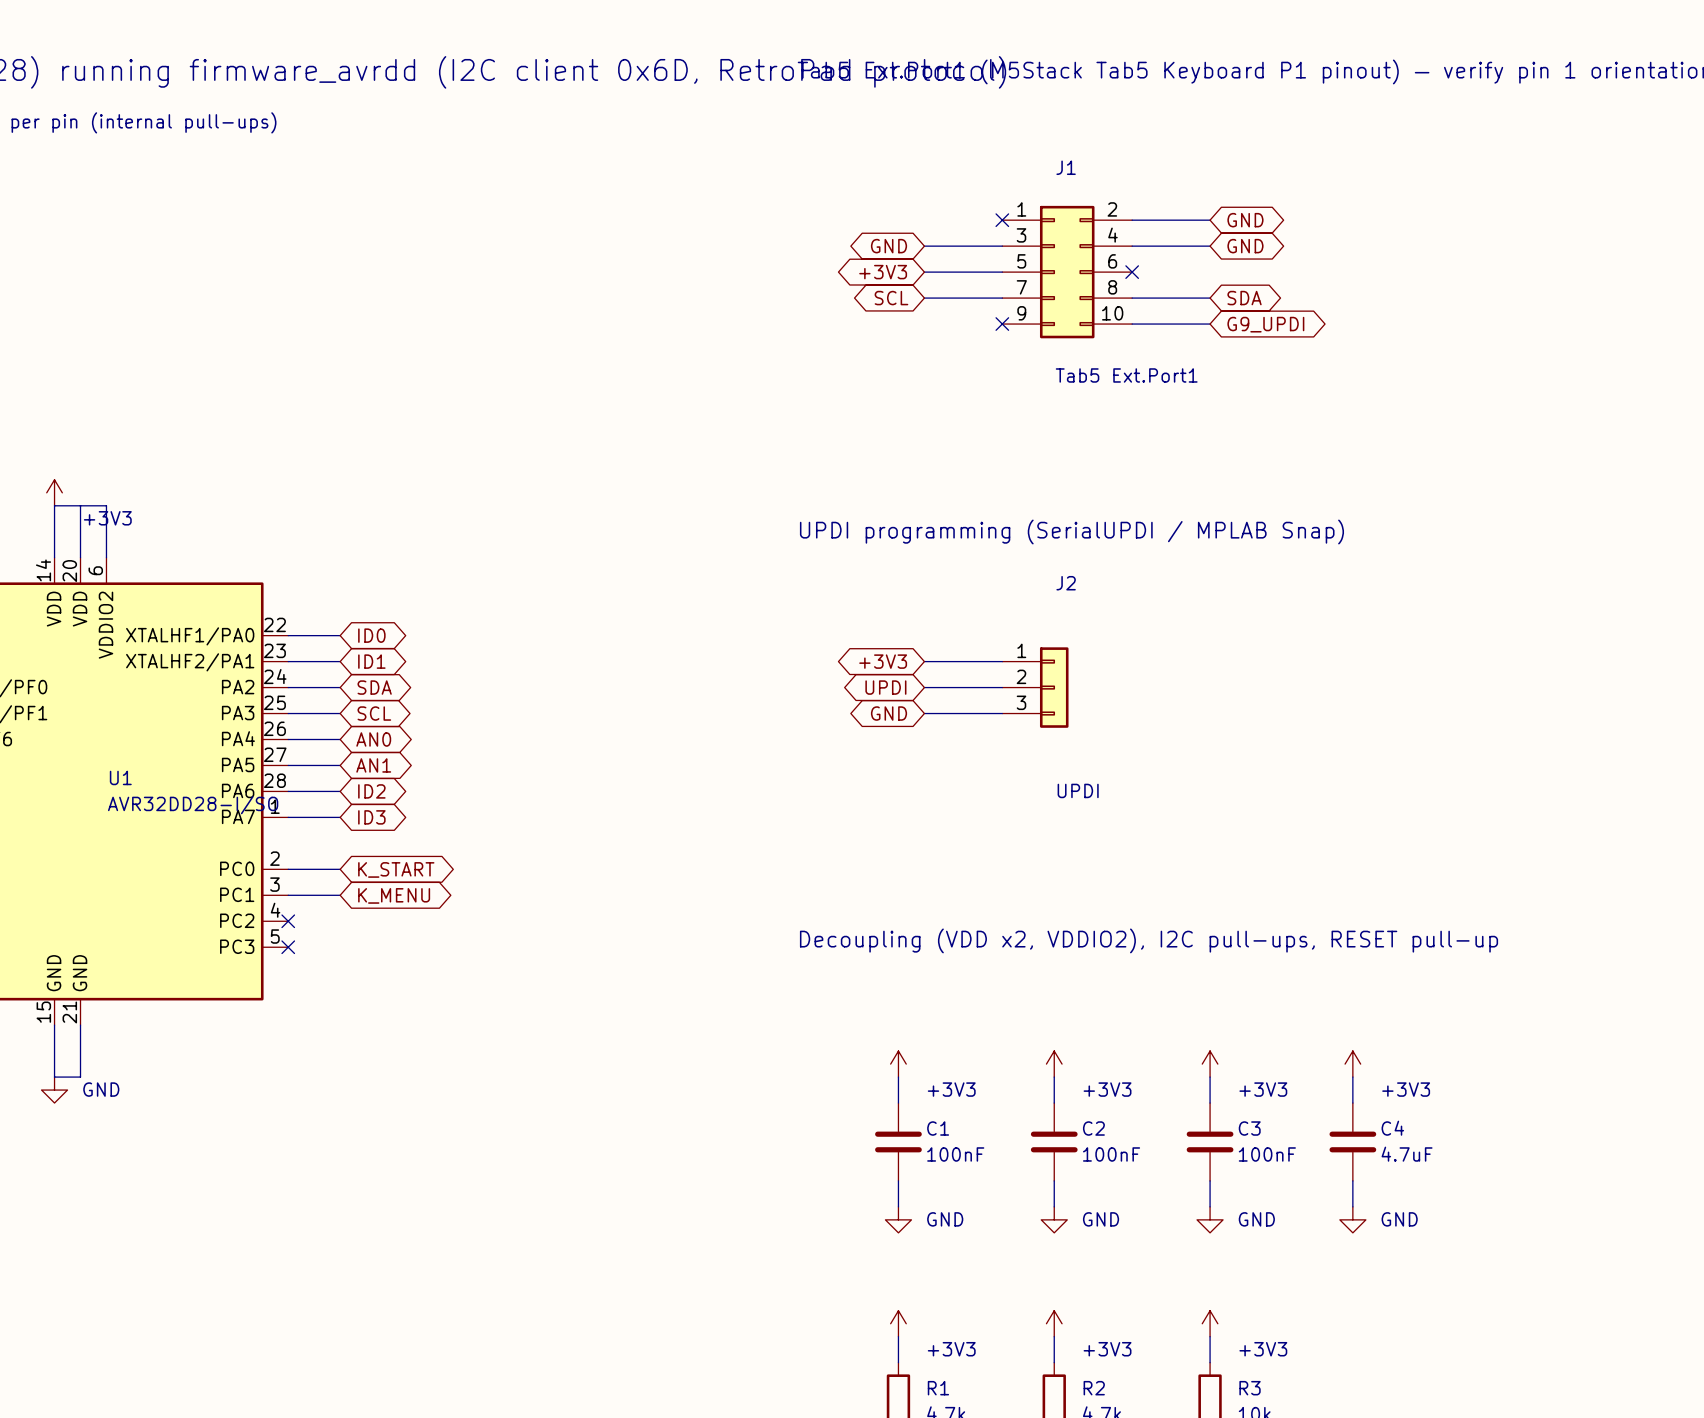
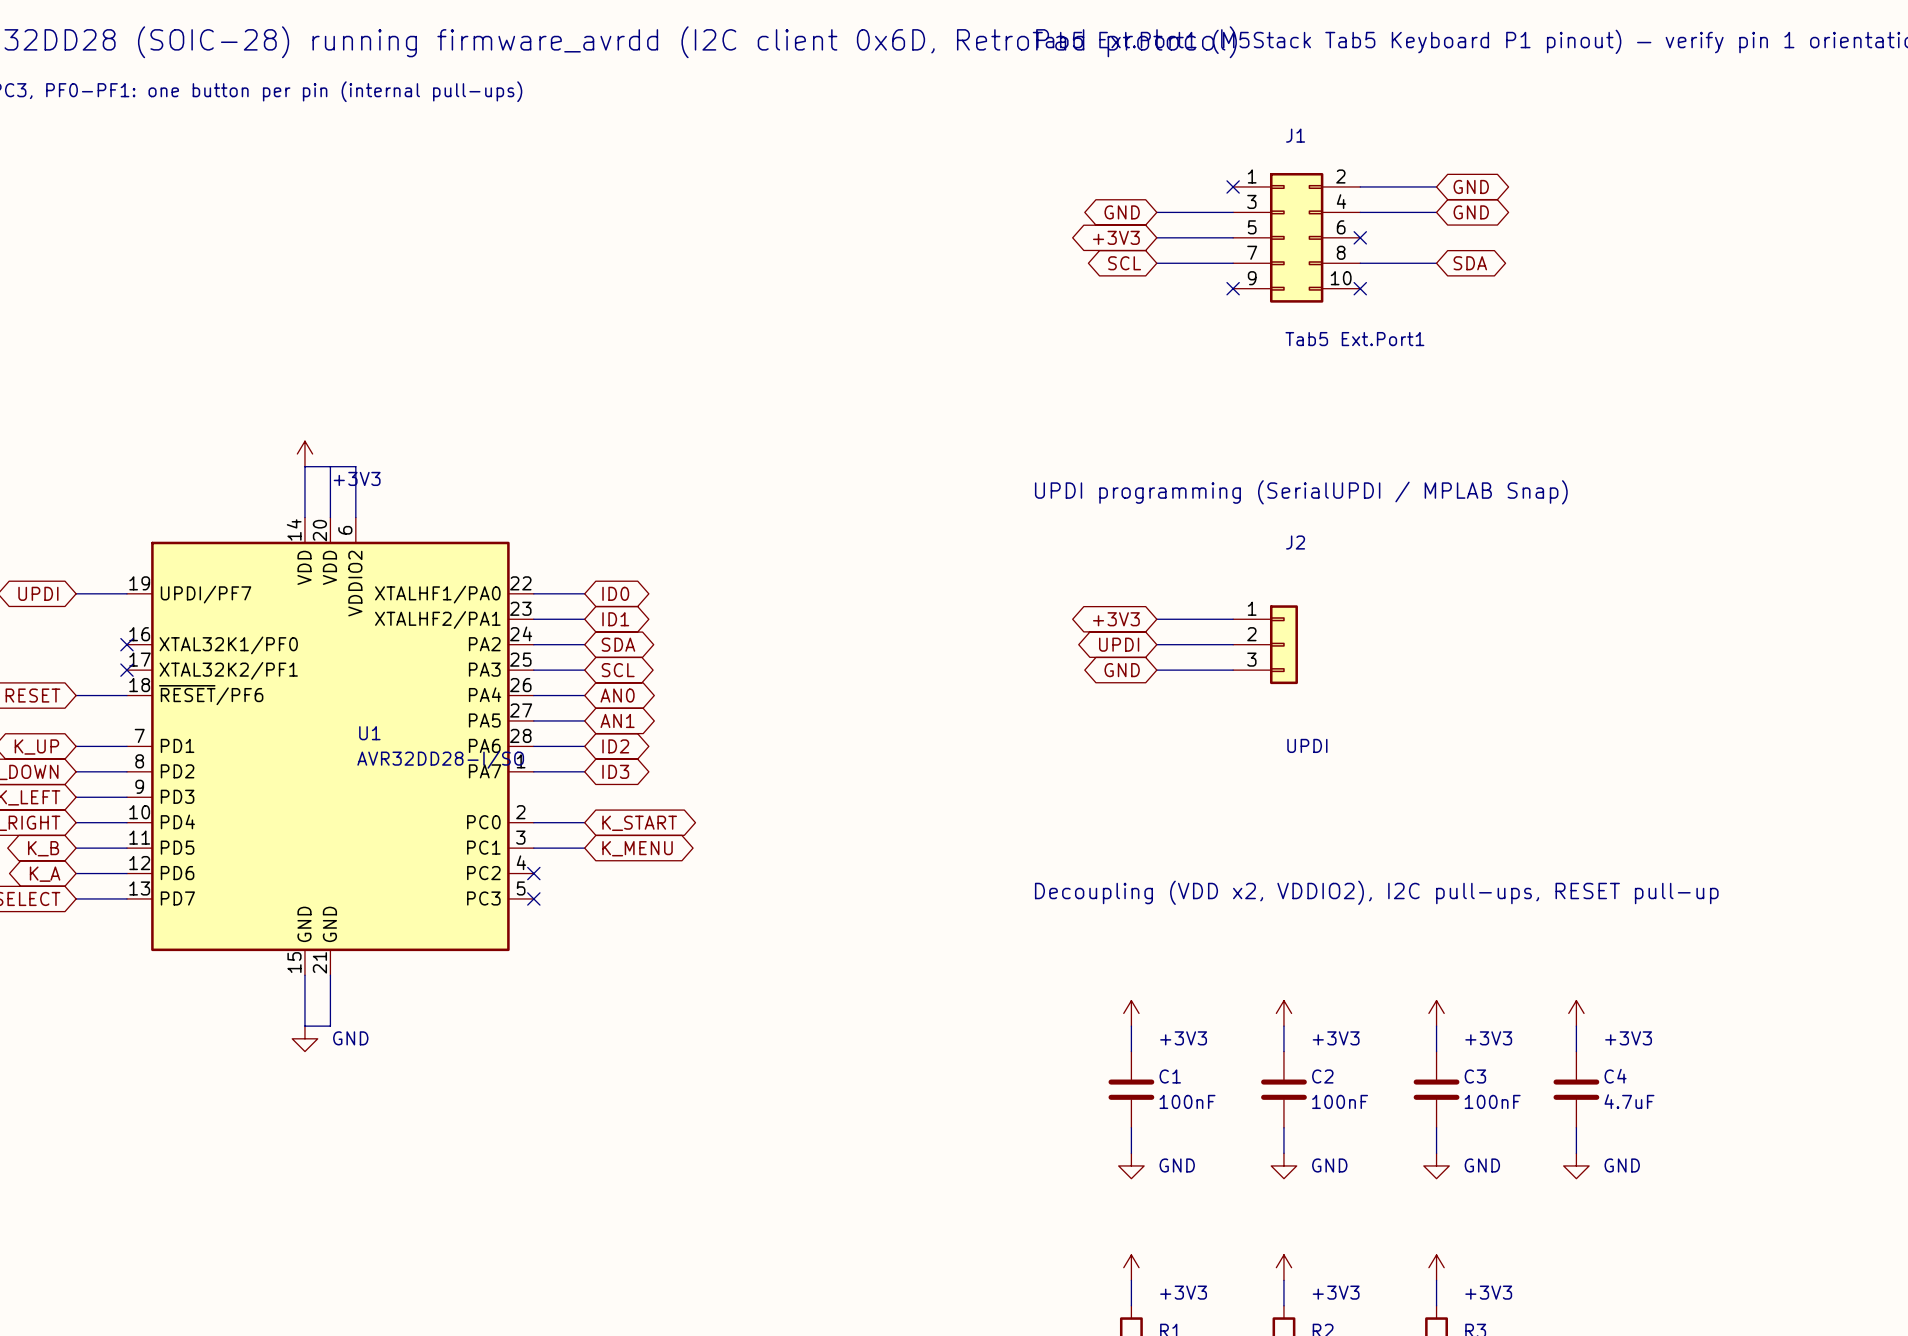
wire: (1132, 324) (1210, 324) -> none
no-connect mark: none -> (1360, 288)
global label: G9_UPDI (1265, 324) -> none

